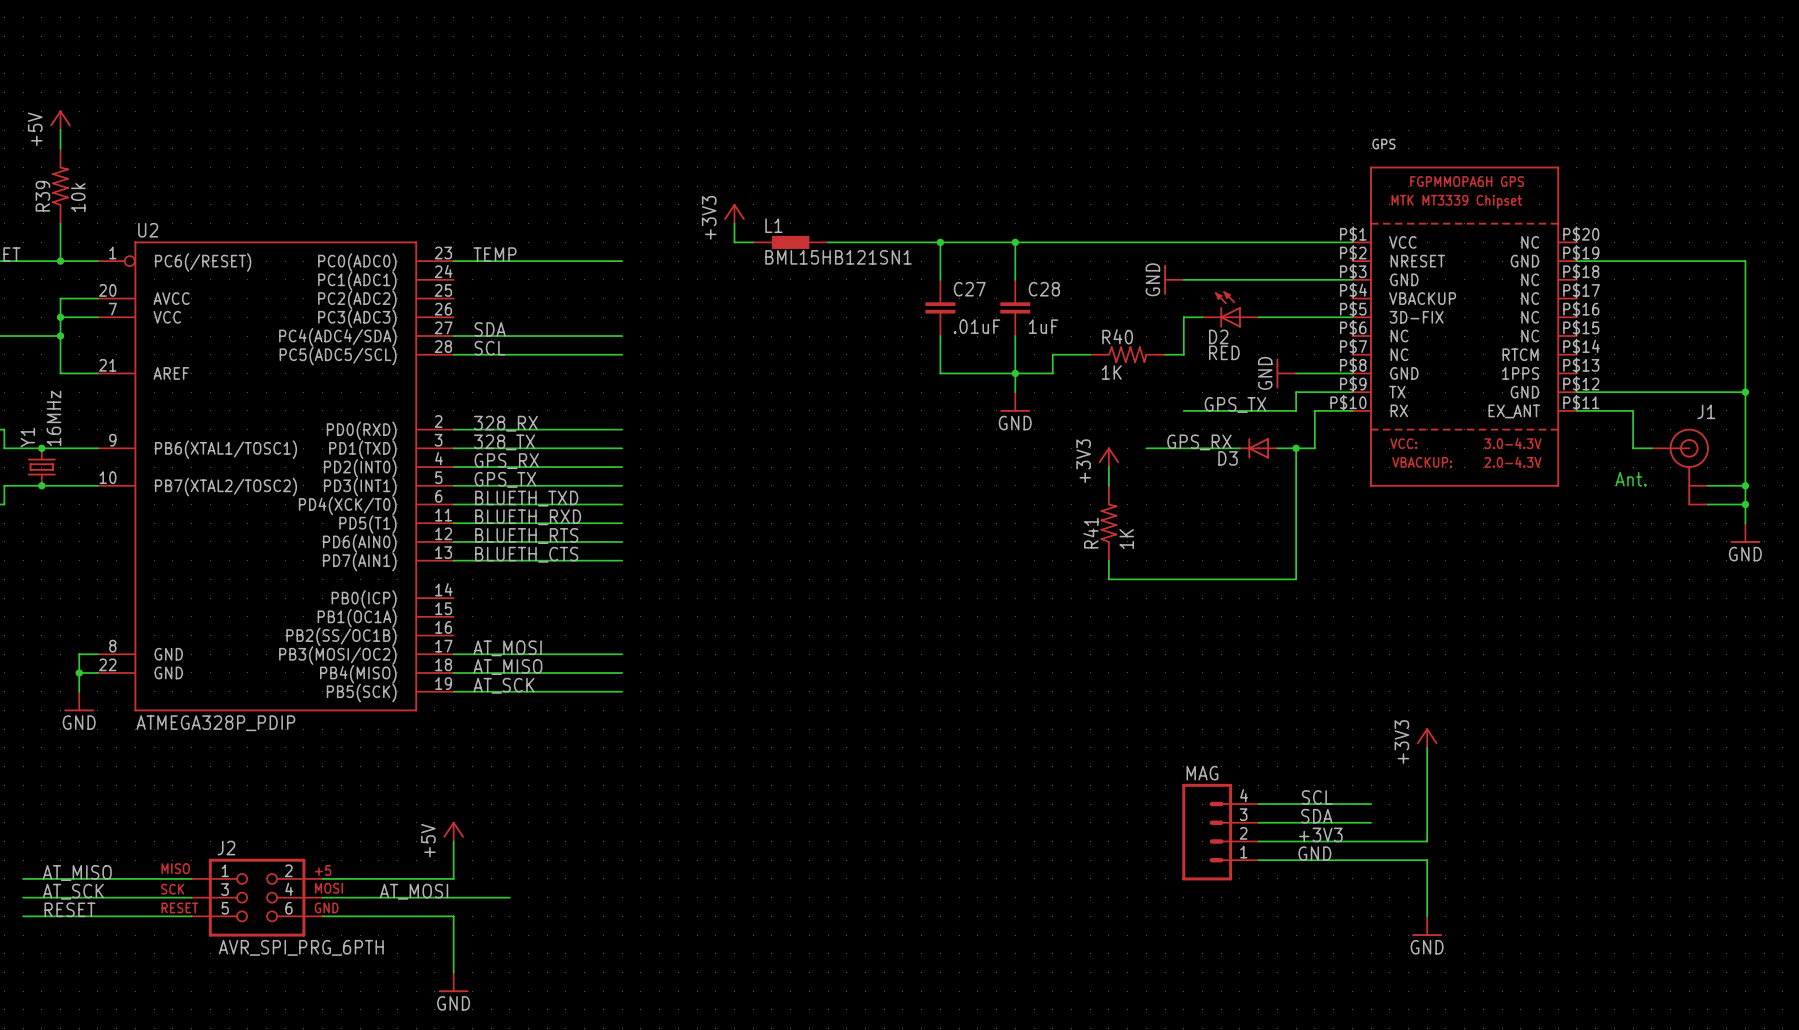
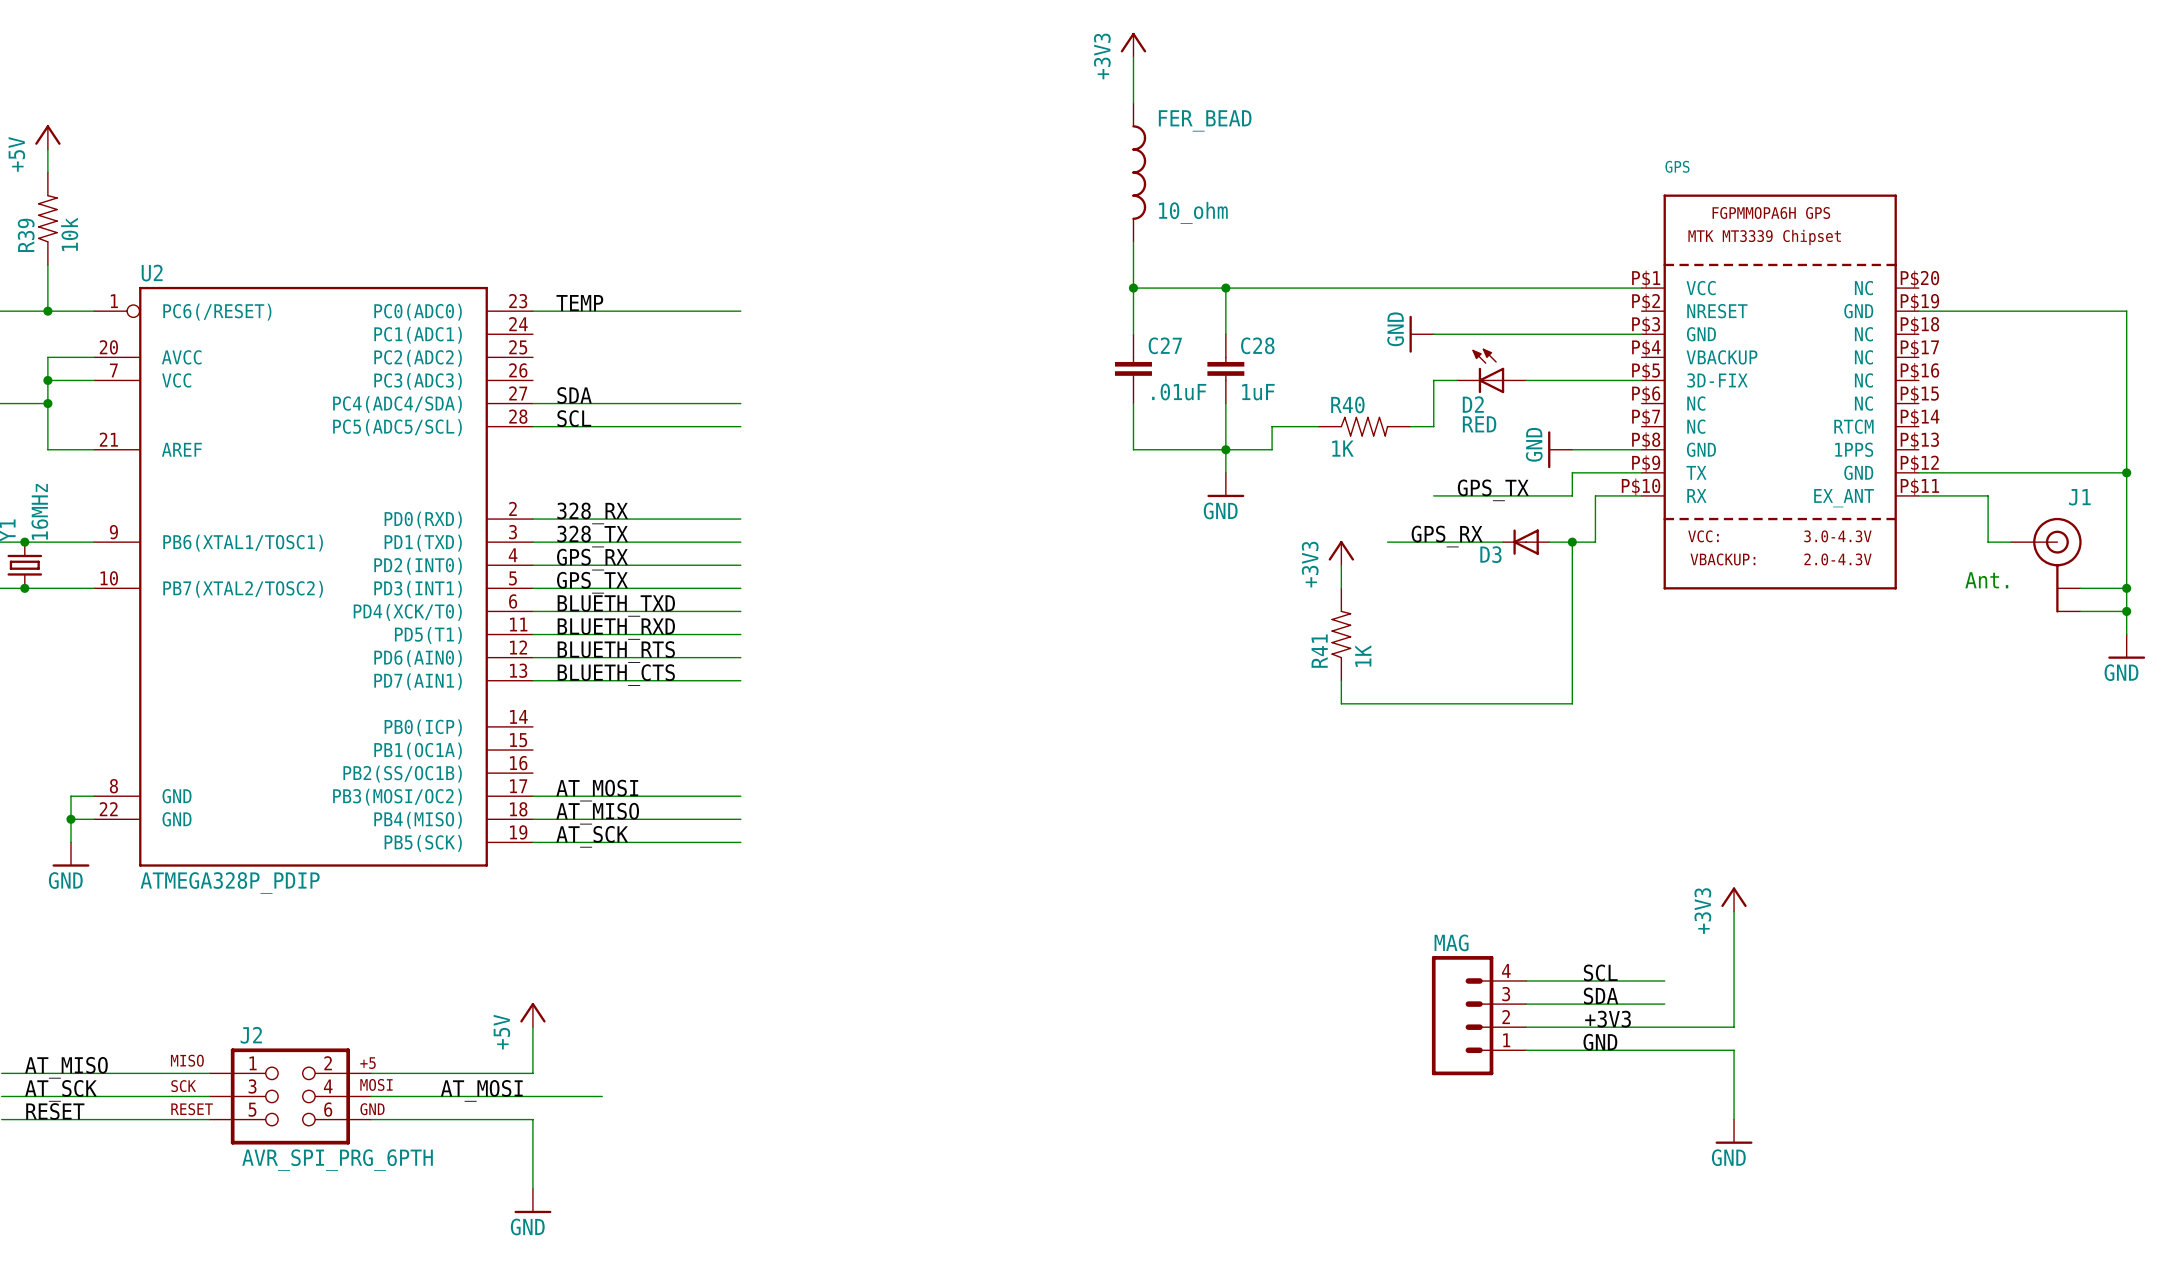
power symbol: none -> +3V3 (1133, 44)
wire: none -> (1133, 57) (1133, 103)
FER_BEAD: none -> 10_ohm (1139, 172)
power symbol: +3V3 (734, 213) -> none
wire: (734, 223) (734, 242) (753, 242) -> none
L1: BML15HB121SN1 (790, 242) -> none
wire: (828, 242) (940, 242) -> (1133, 241) (1133, 288)

